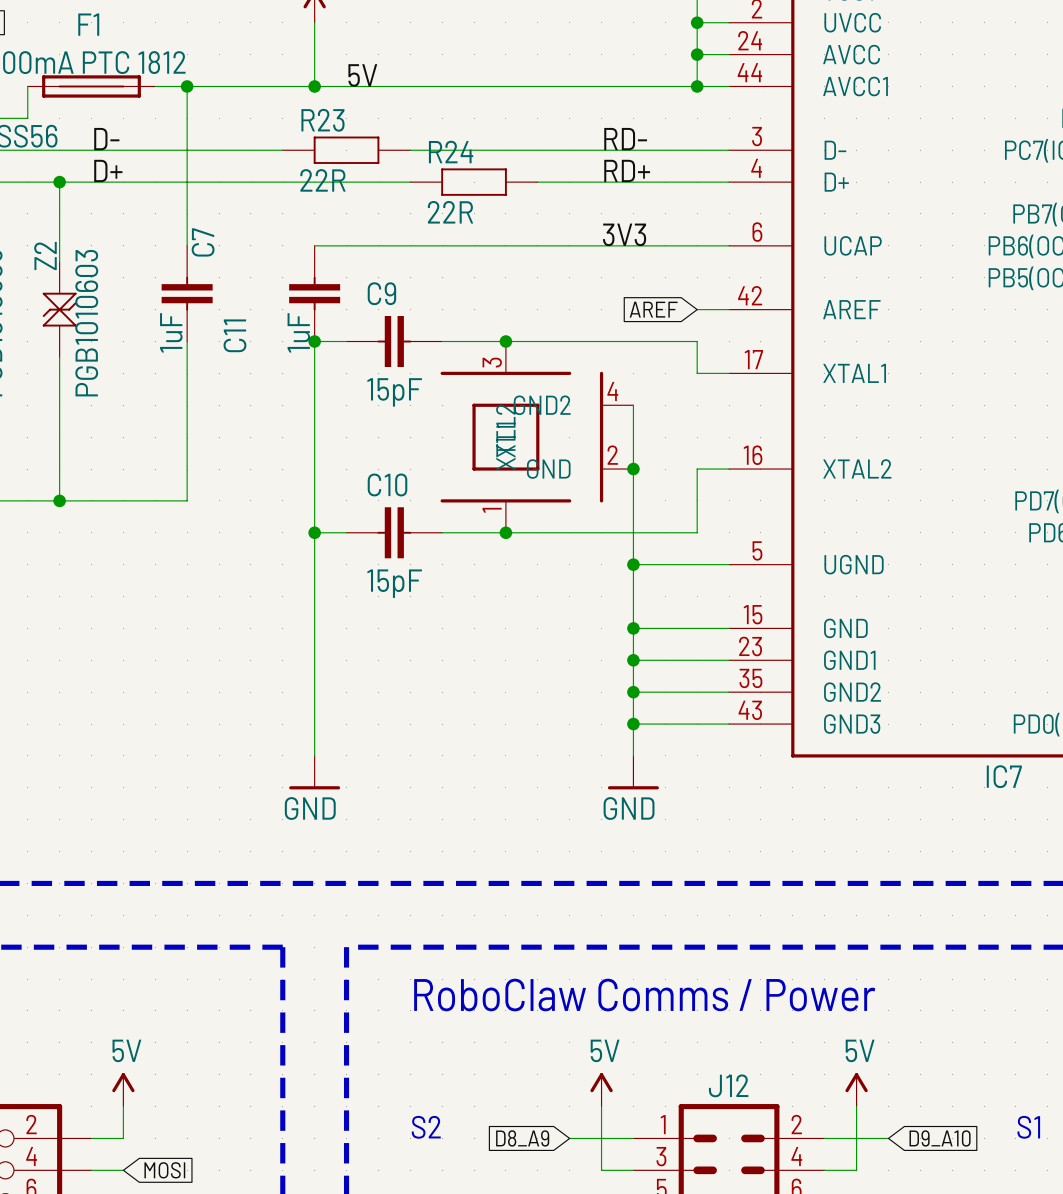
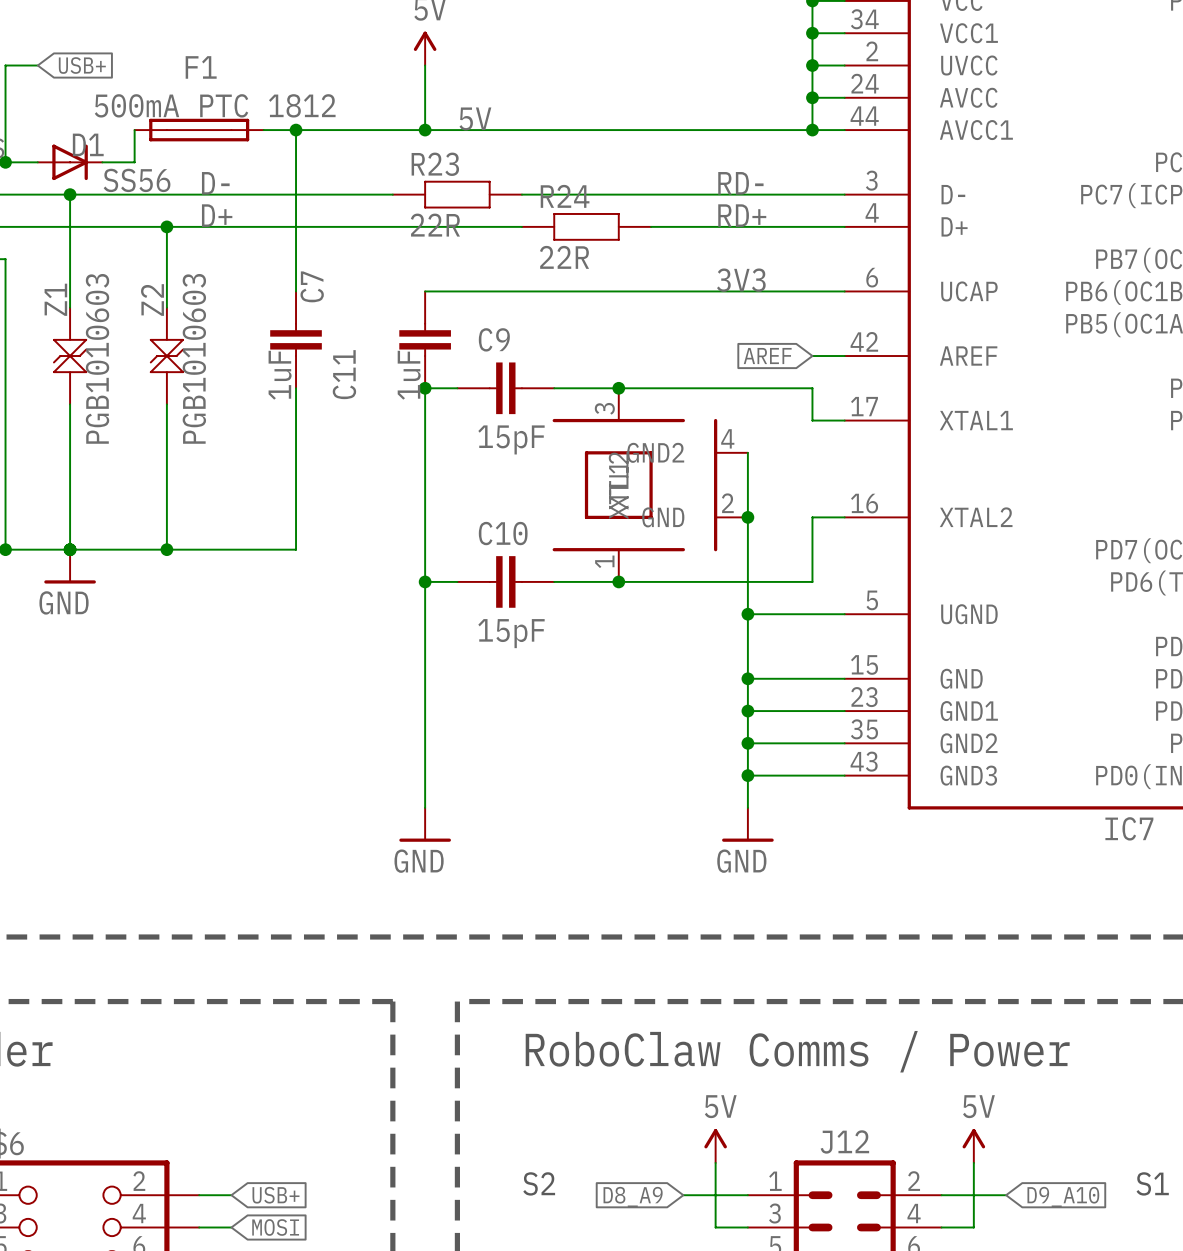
power symbol: 5V (123, 1089) -> none
wire: (123, 1106) (123, 1138) -> none
global label: none -> USB+ (275, 1195)

